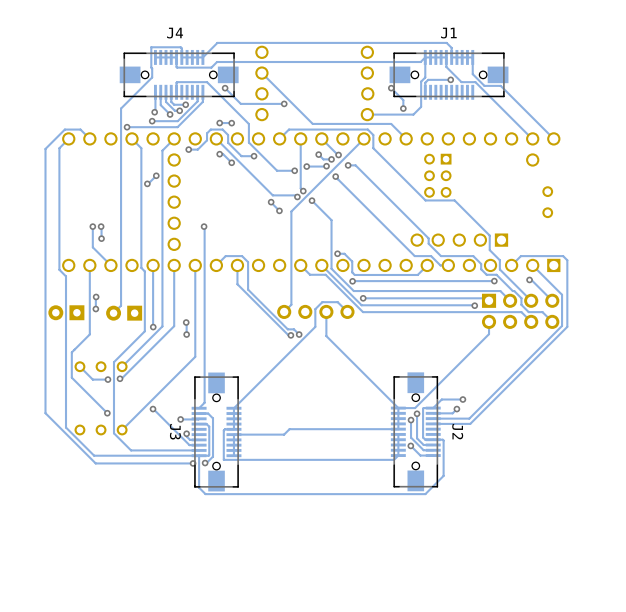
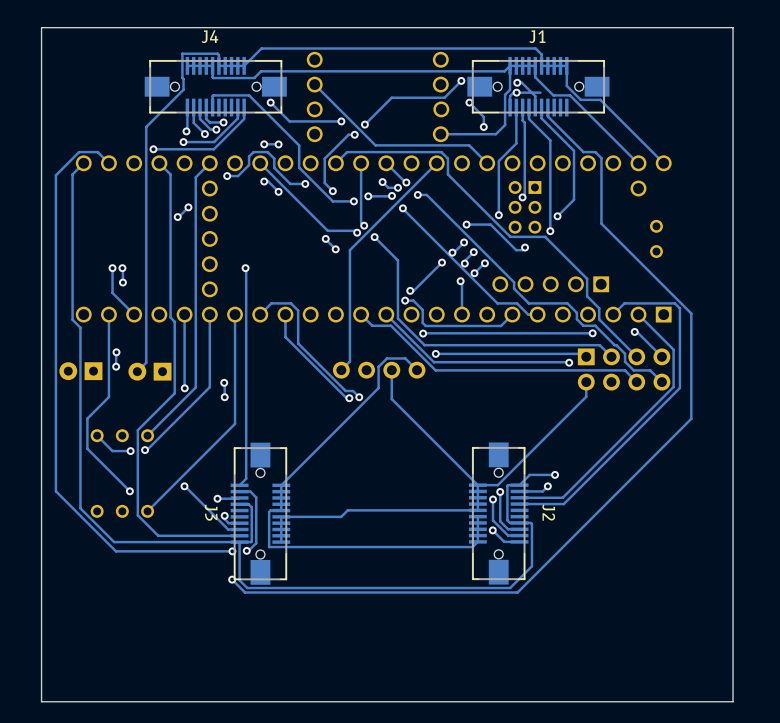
board edge: none -> (733, 27) (41, 27) (41, 701) (733, 701) (733, 27)
track: none -> (461, 80) (444, 97) (391, 97) (364, 124)
via: none -> (461, 80)
track: none -> (517, 82) (521, 82) (535, 96) (535, 107)
via: none -> (517, 82)
via: none -> (516, 92)
via: (450, 79) -> none
track: none -> (516, 107) (516, 143) (498, 161) (498, 215)
track: none -> (522, 107) (522, 120) (524, 122) (524, 195) (522, 197)
track: none -> (528, 107) (528, 118) (550, 140) (550, 231)
track: none -> (541, 107) (541, 118) (574, 150) (574, 199) (557, 216)
track: none -> (547, 107) (547, 116) (583, 152) (595, 152) (601, 158) (601, 223) (691, 313) (691, 418) (517, 592) (245, 592) (232, 579)
via: none -> (364, 124)
track: none -> (354, 134) (348, 134) (324, 158) (324, 183) (332, 191)
via: none -> (354, 134)
via: none -> (332, 191)
via: none -> (522, 197)
via: none -> (498, 215)
via: none -> (557, 216)
track: none -> (466, 224) (490, 224) (516, 250) (522, 250) (525, 247)
via: none -> (466, 224)
via: none -> (550, 231)
track: none -> (464, 242) (452, 252)
via: none -> (464, 242)
via: none -> (525, 247)
via: none -> (452, 252)
track: none -> (473, 252) (464, 261) (464, 263)
via: none -> (473, 252)
track: none -> (442, 262) (413, 290) (410, 290)
via: none -> (442, 262)
via: none -> (464, 263)
track: none -> (484, 263) (474, 273)
via: none -> (484, 263)
via: none -> (474, 273)
track: none -> (460, 281) (461, 314)
via: none -> (460, 281)
via: none -> (410, 290)
via: none -> (232, 579)

